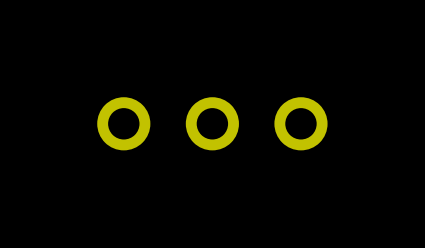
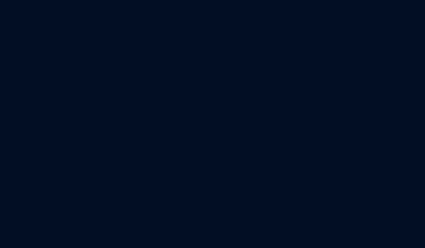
part: (212, 123) -> none

